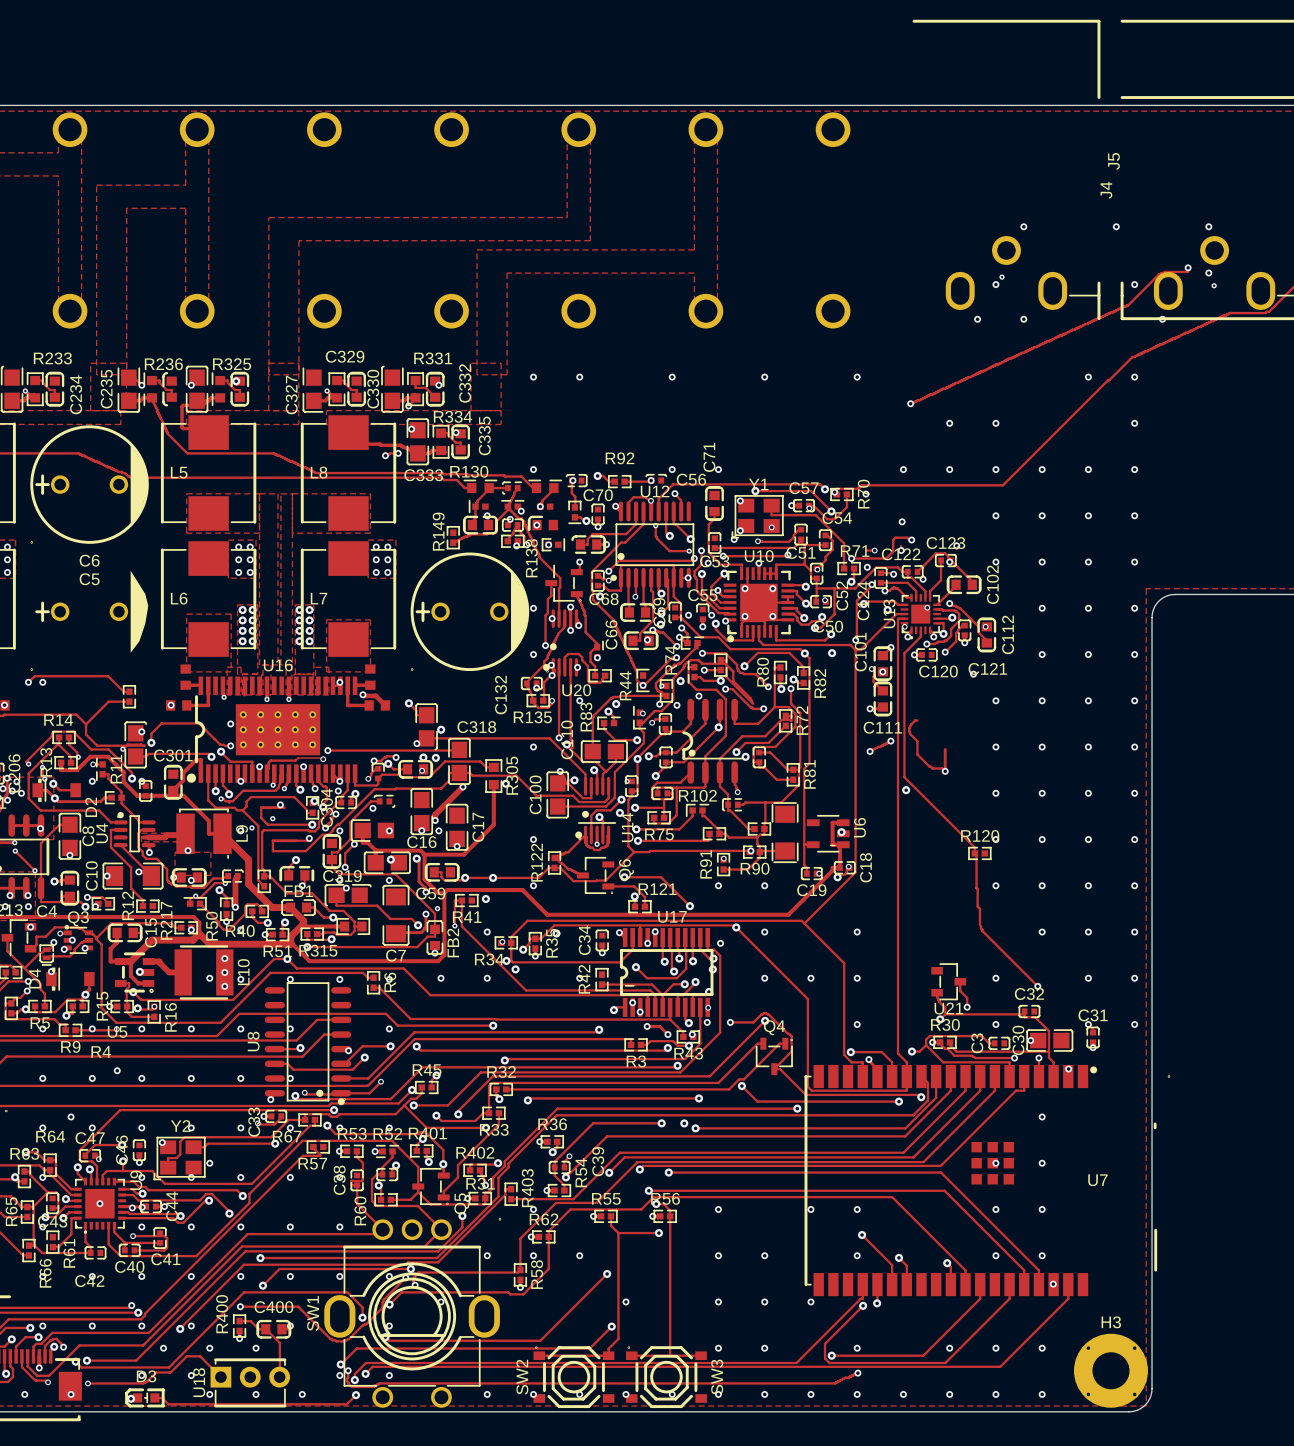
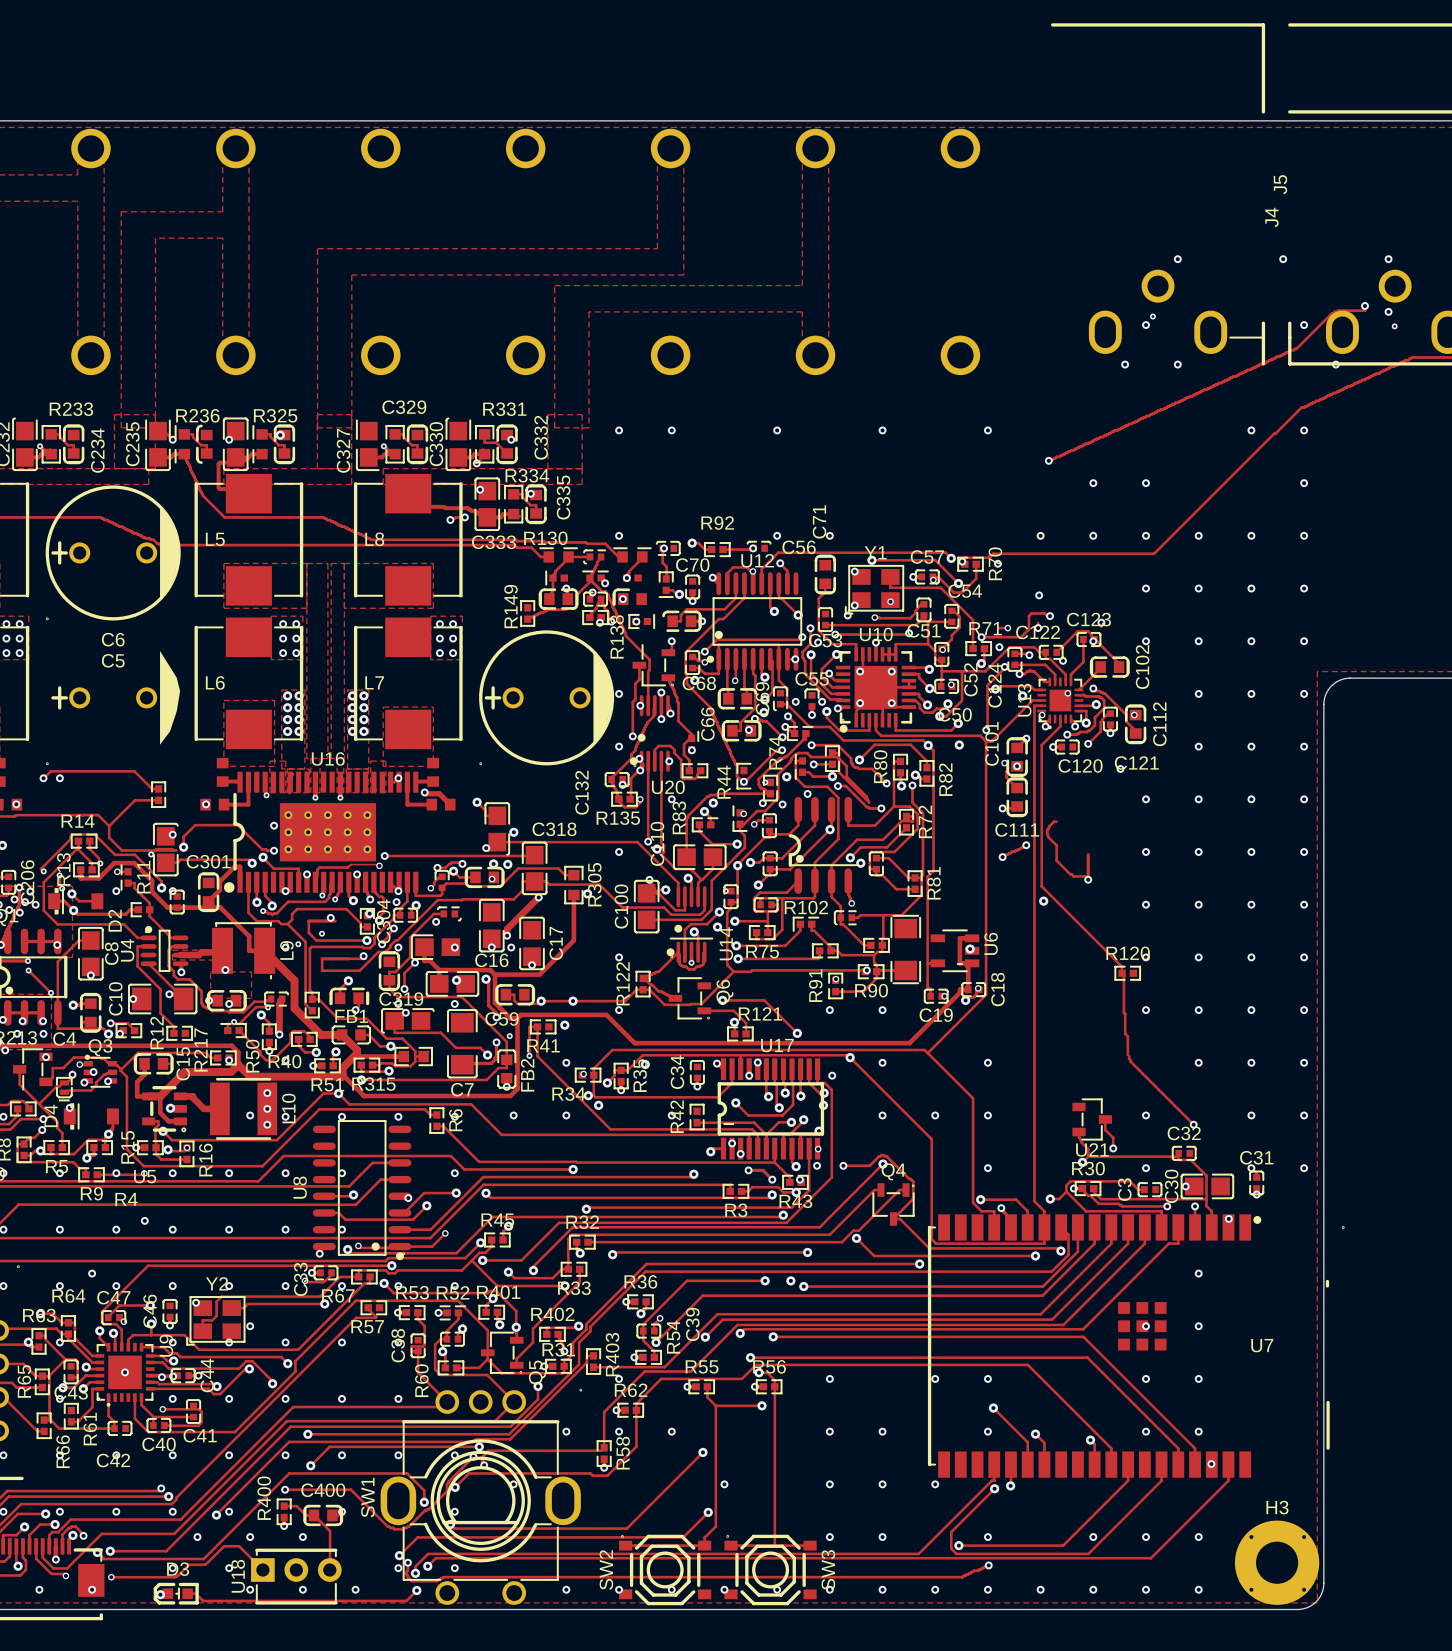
track: (655, 525) (656, 538) (669, 551) (689, 551) -> none
via: (655, 525) -> none
via: (689, 551) -> none

